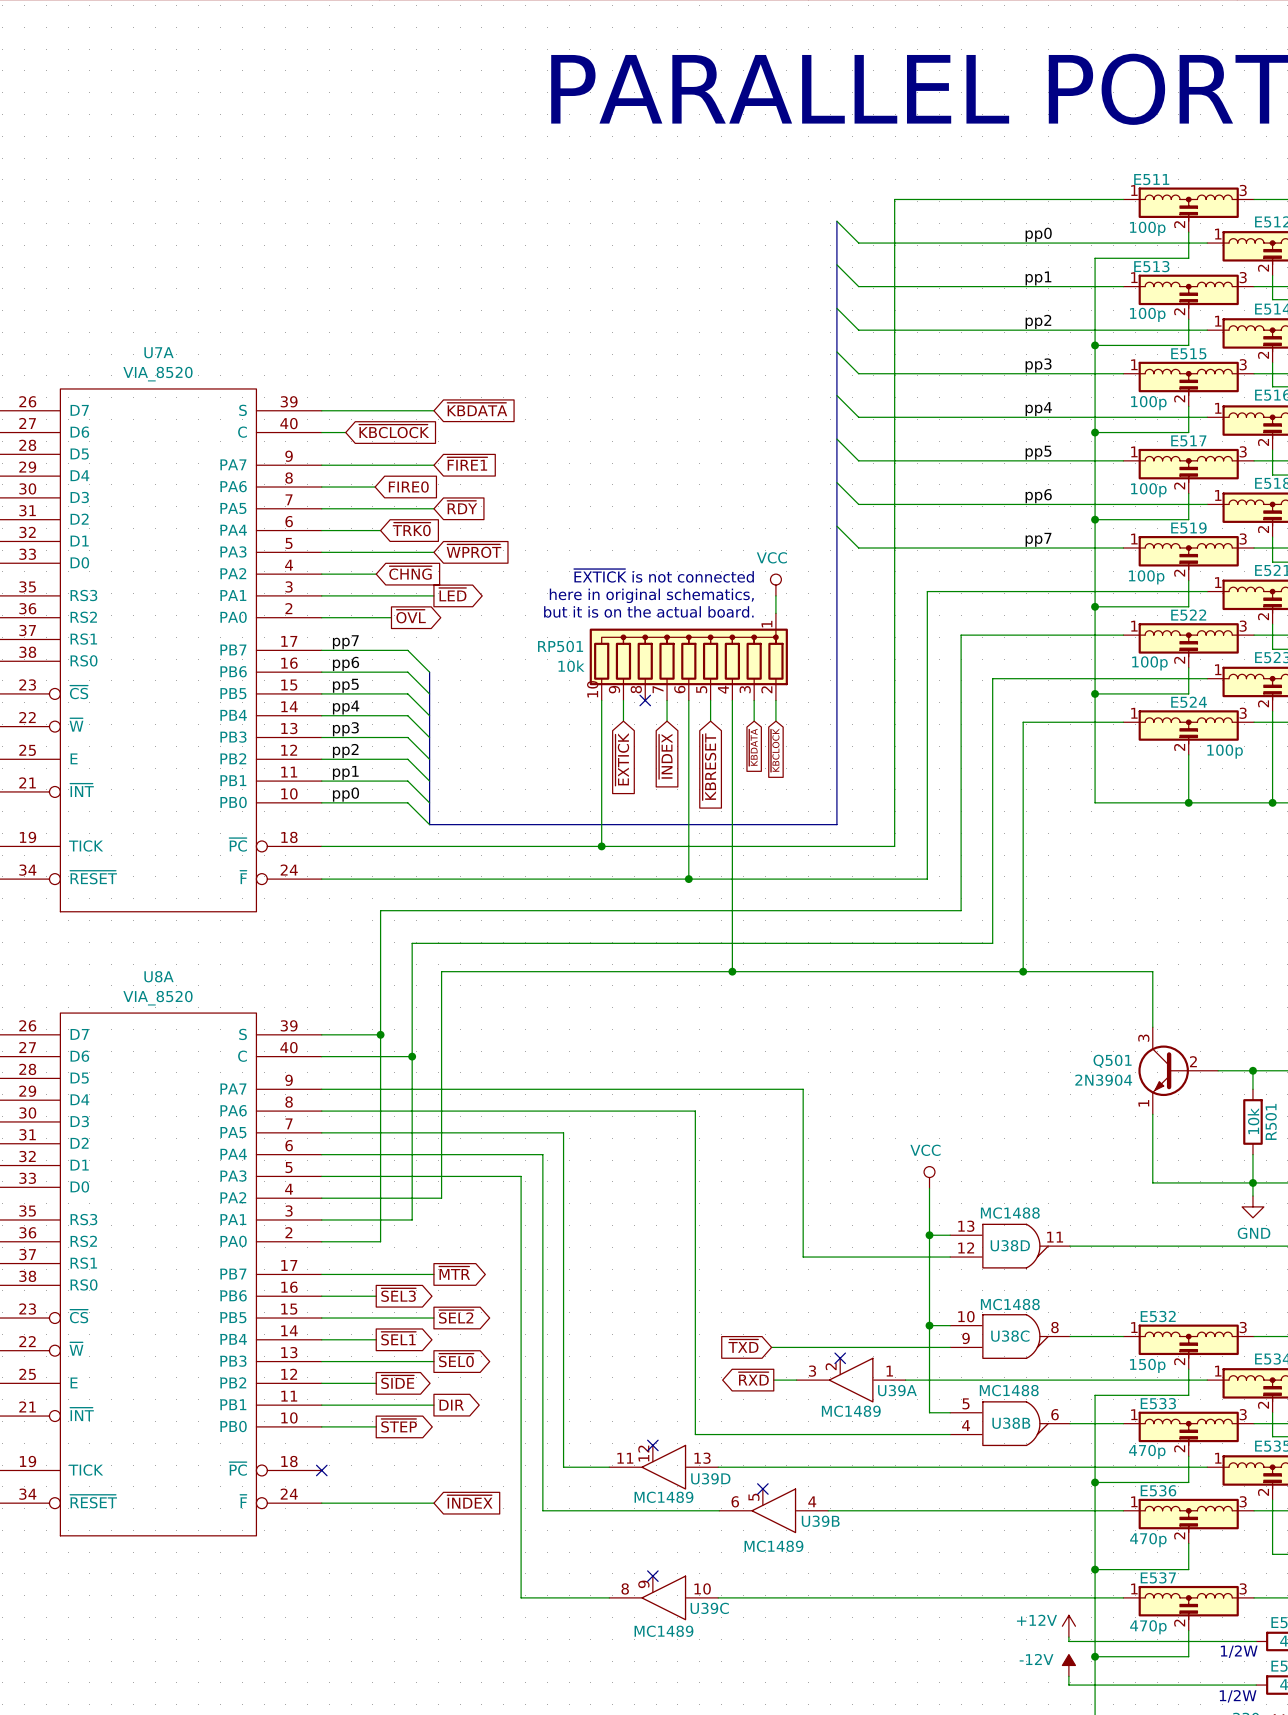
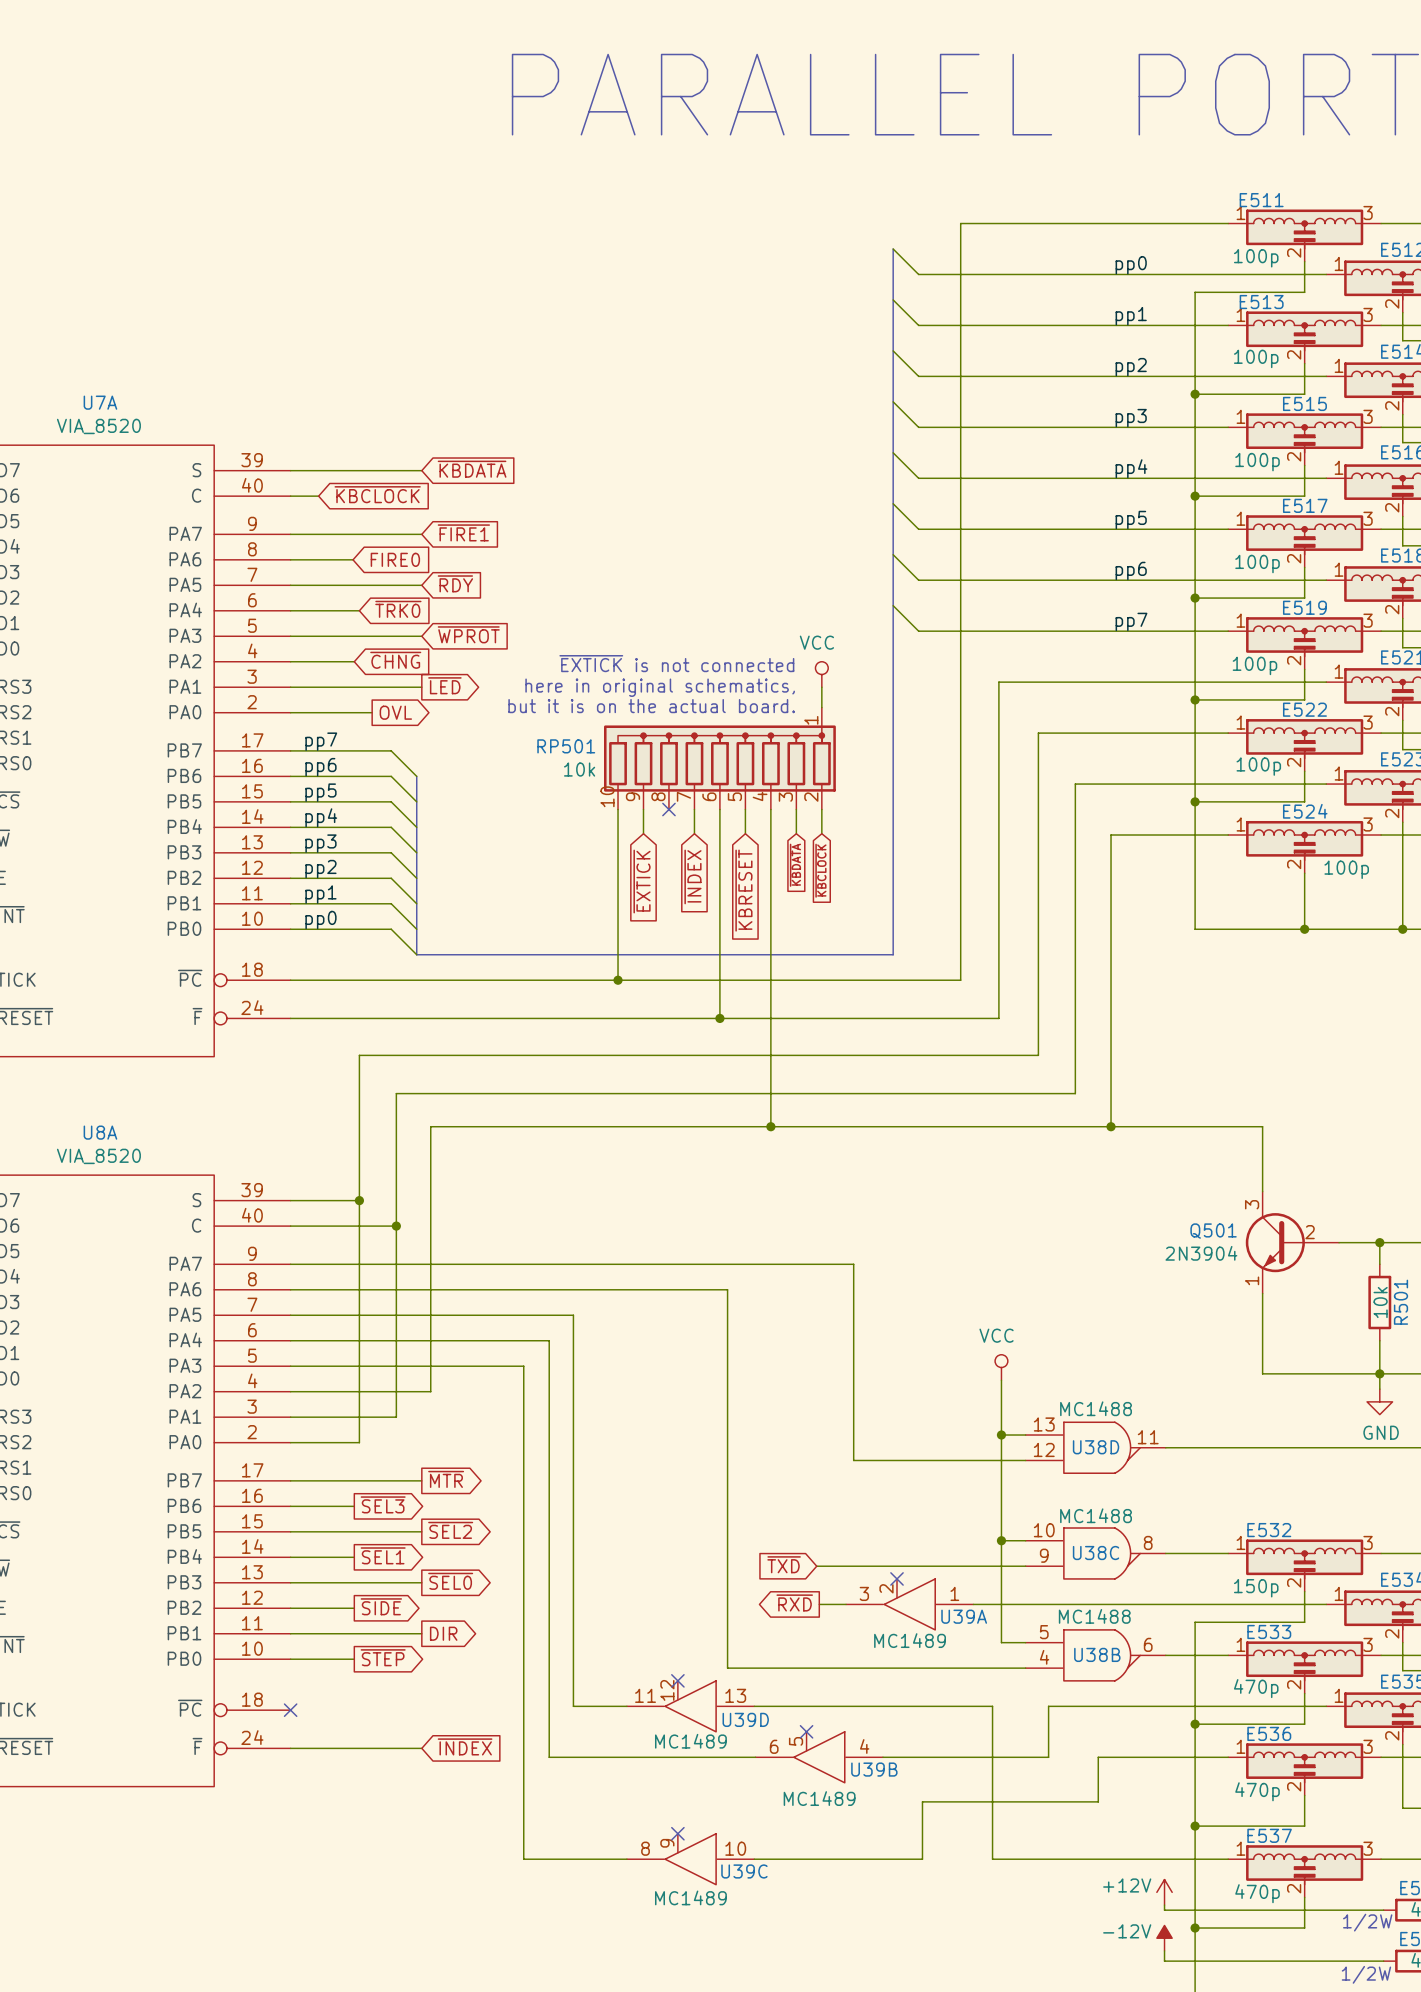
global label: ~{OVL} (411, 616) -> OVL (395, 712)
wire: (921, 1467) (969, 1467) -> (992, 1706) (992, 1859)
wire: (969, 1510) (1012, 1510) -> (1048, 1757) (1048, 1706)
wire: (861, 1597) (921, 1597) -> (922, 1859) (922, 1801) (1098, 1801) (1098, 1757)

